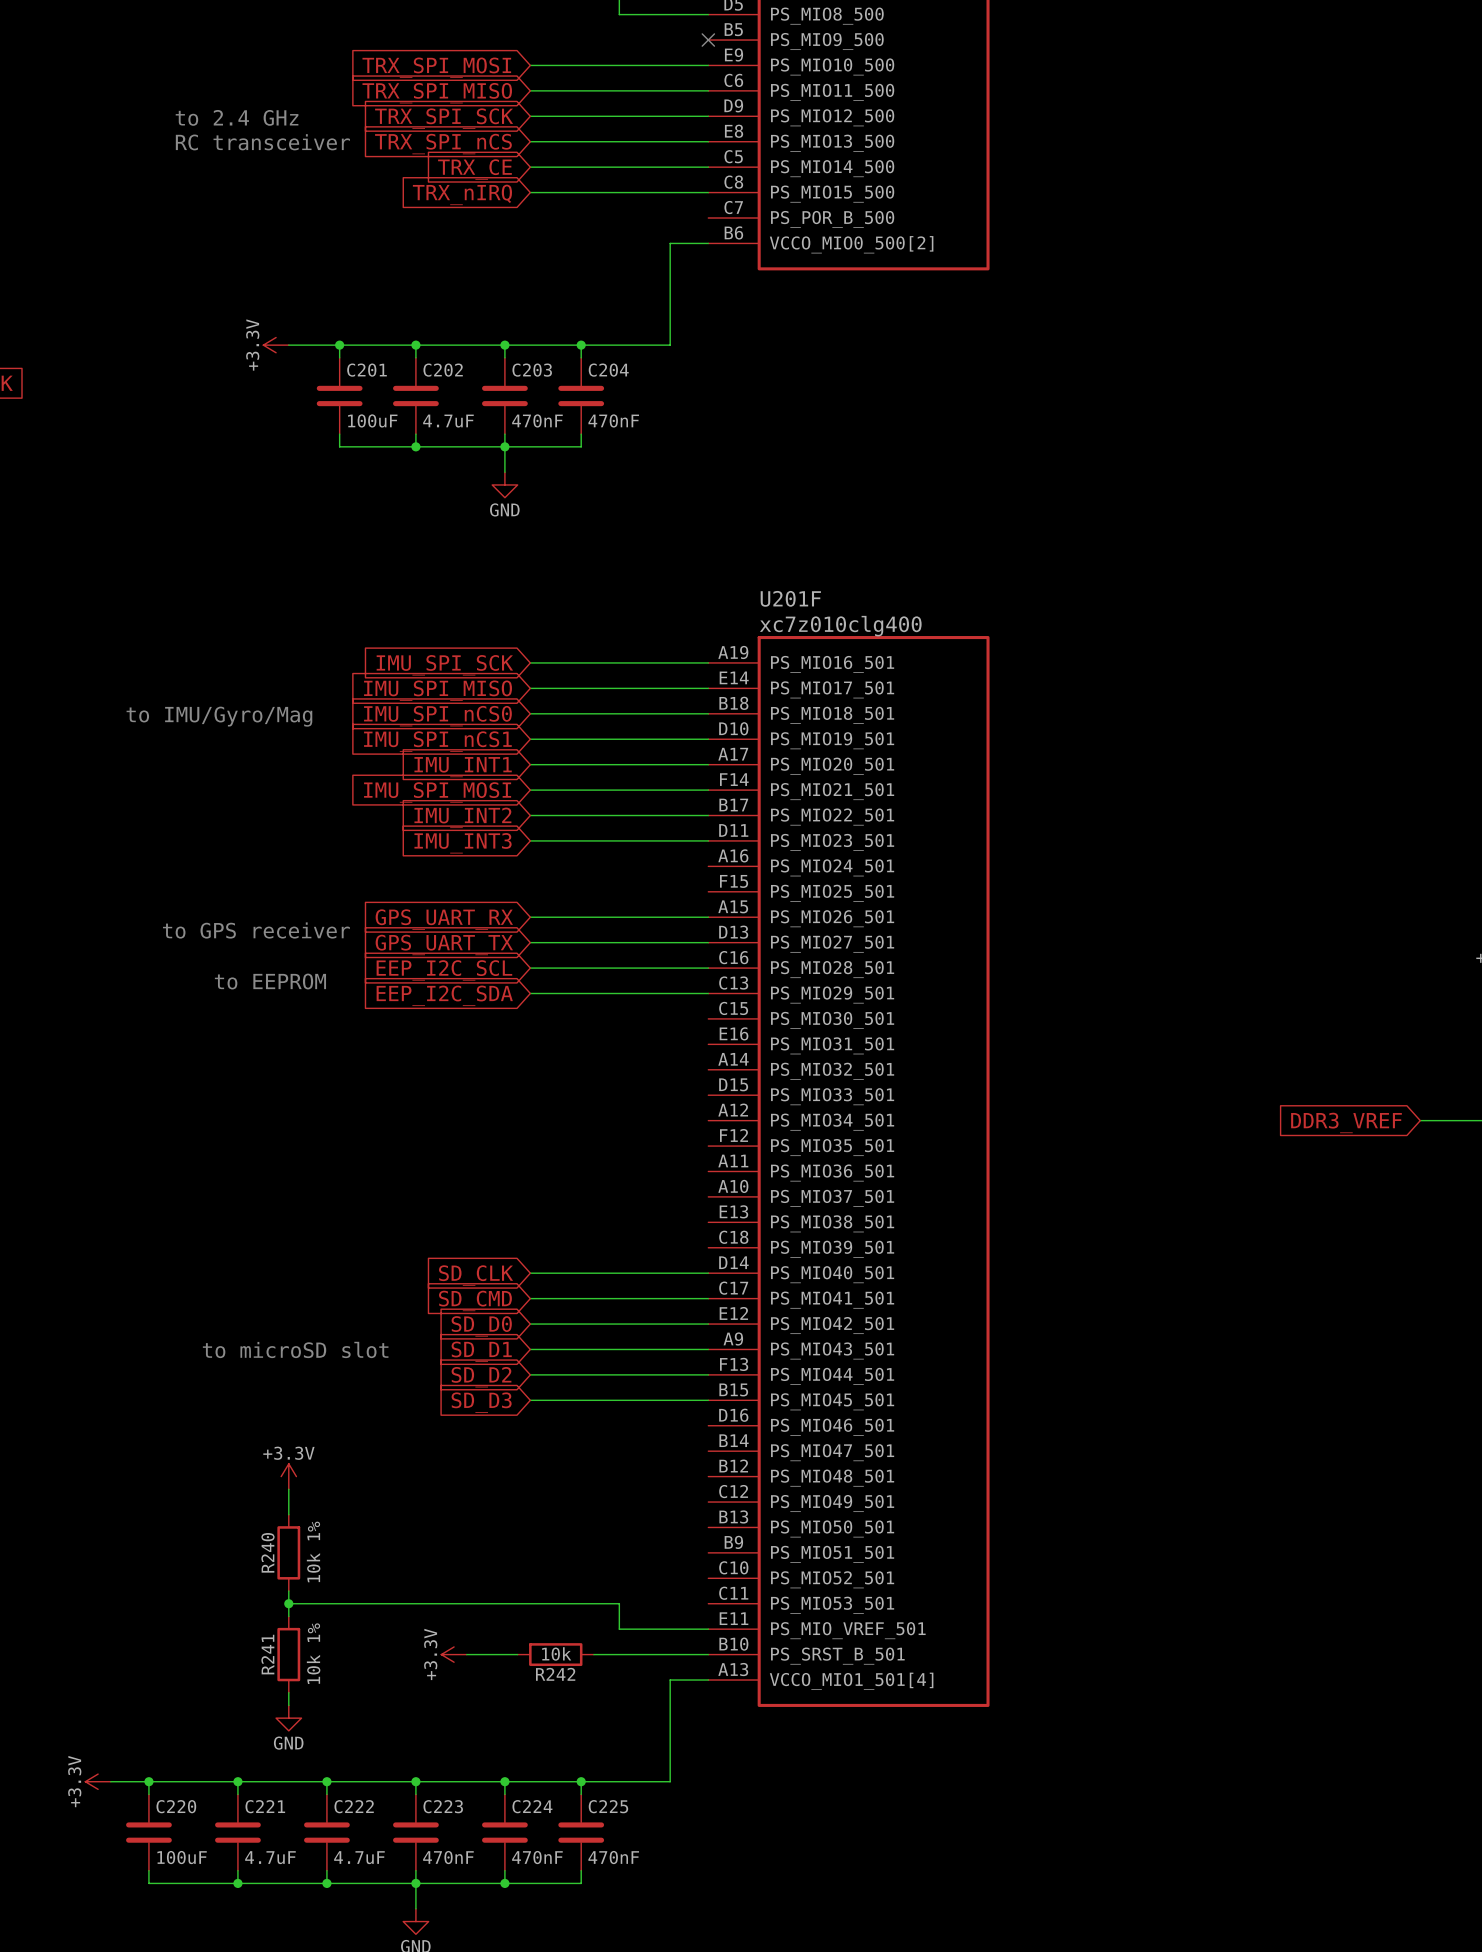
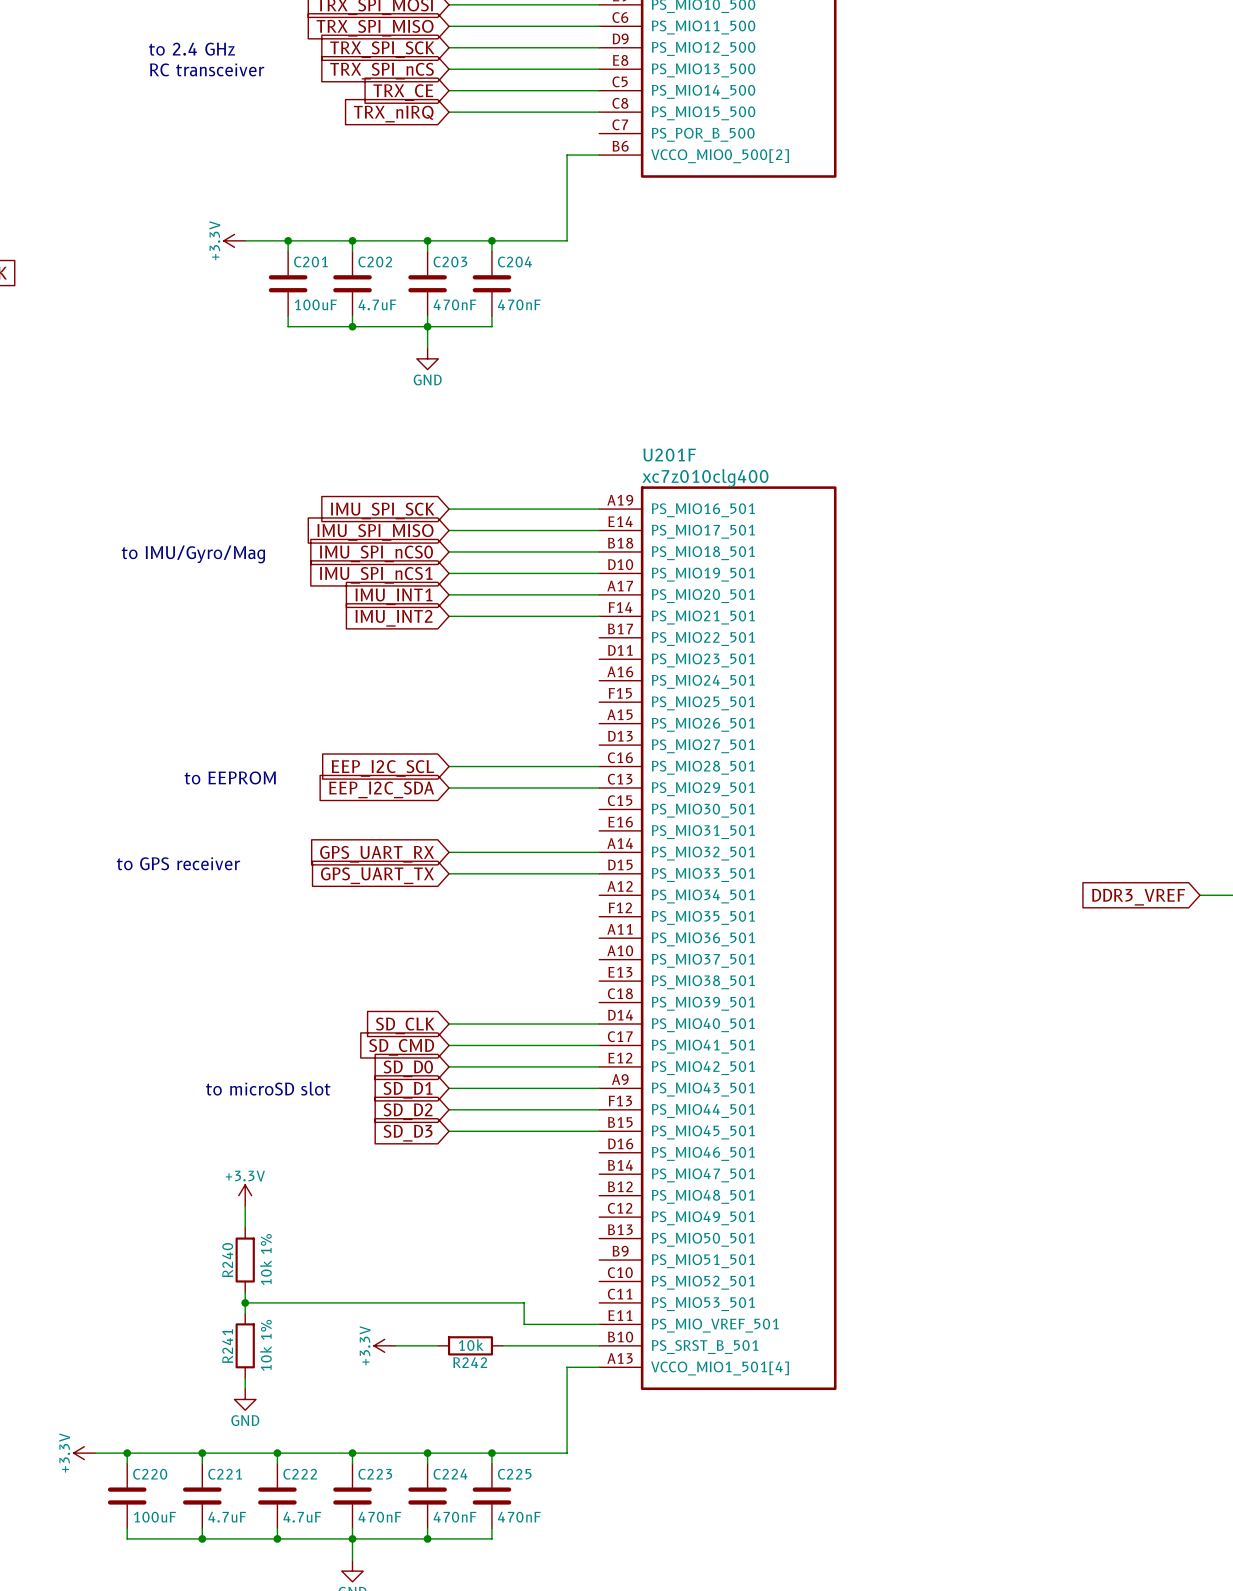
global label: IMU_SPI_MOSI (437, 792) -> IMU_INT2 (393, 618)
wire: (530, 815) (708, 815) -> none
global label: IMU_INT2 (462, 817) -> none
wire: (530, 840) (708, 840) -> none
global label: IMU_INT3 (463, 843) -> none
wire: (530, 917) (708, 917) -> (449, 873) (599, 873)
global label position: GPS_UART_RX (444, 919) -> GPS_UART_RX (377, 854)
text position: to GPS receiver (256, 930) -> to GPS receiver (178, 863)
wire: (530, 942) (708, 942) -> (449, 852) (599, 852)
global label position: GPS_UART_TX (444, 944) -> GPS_UART_TX (377, 875)

